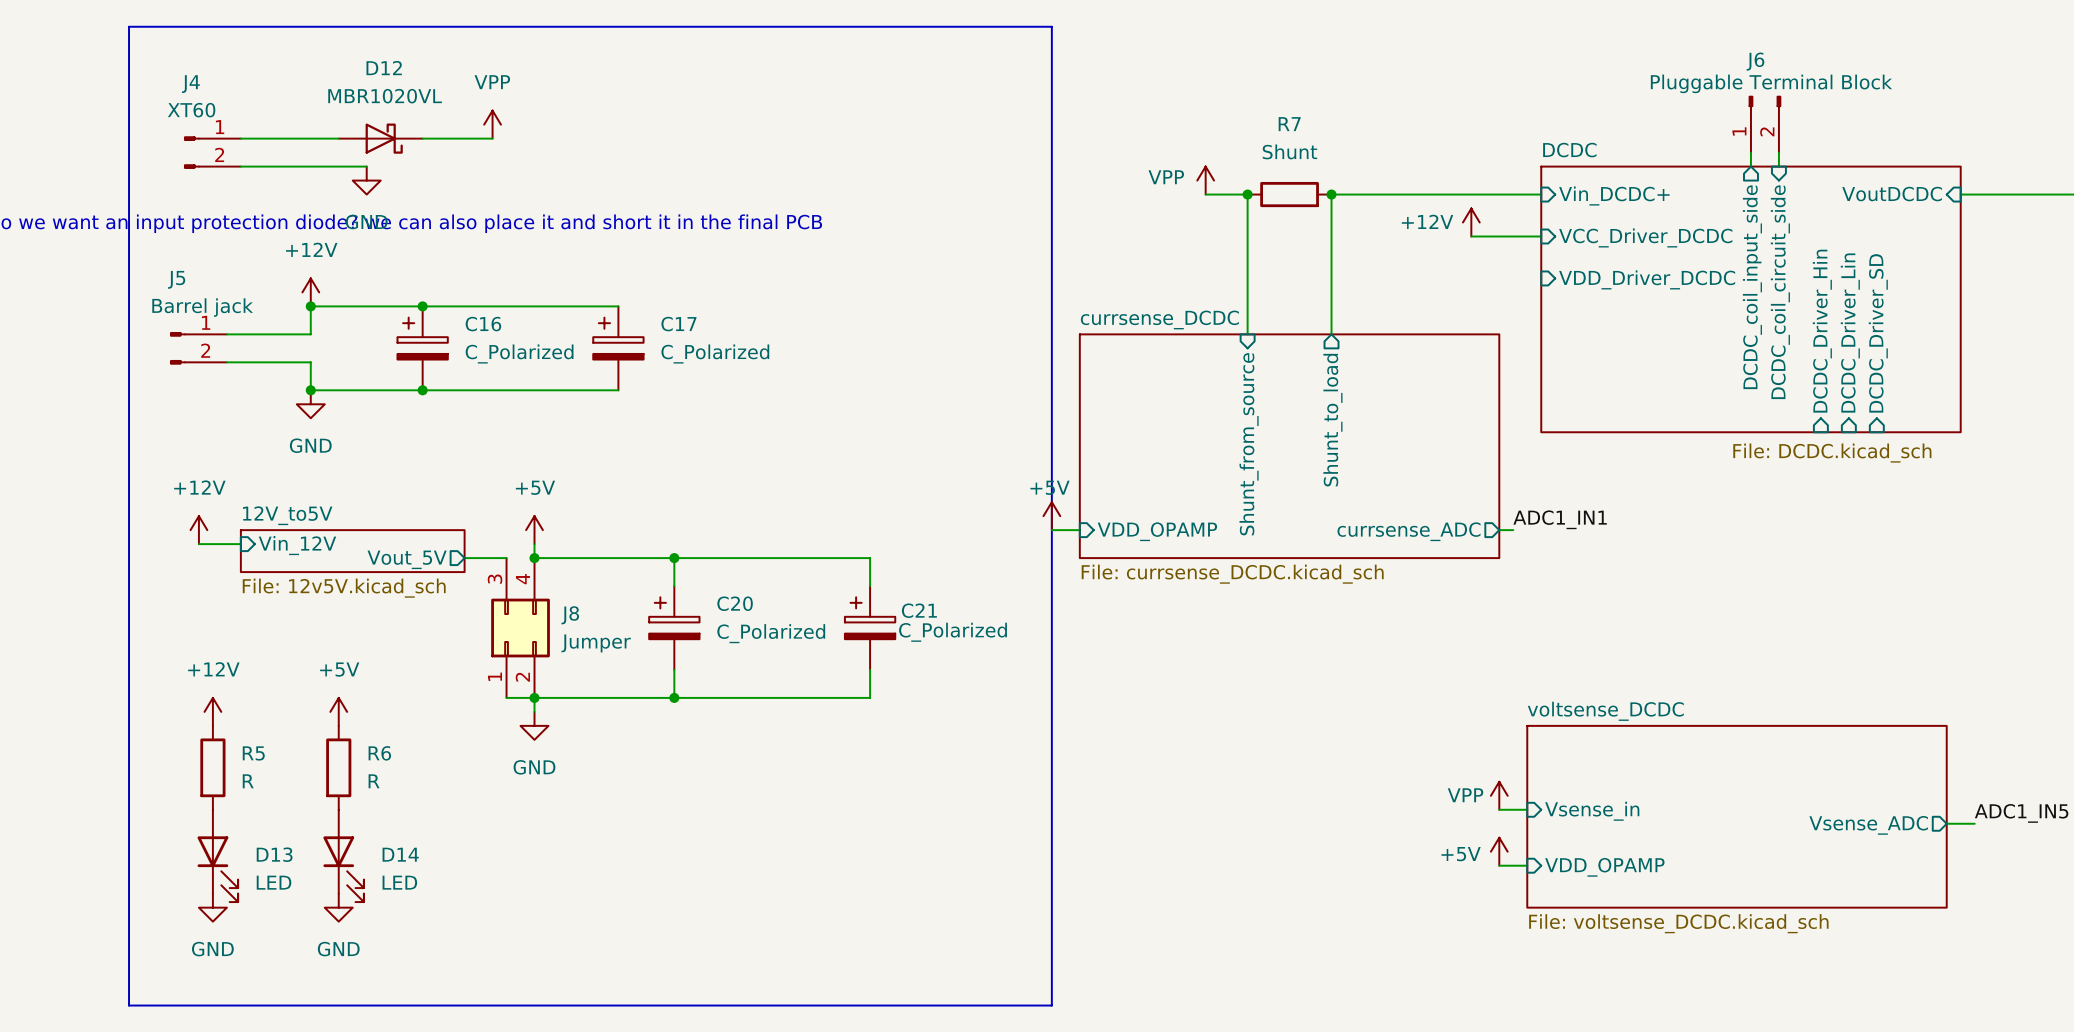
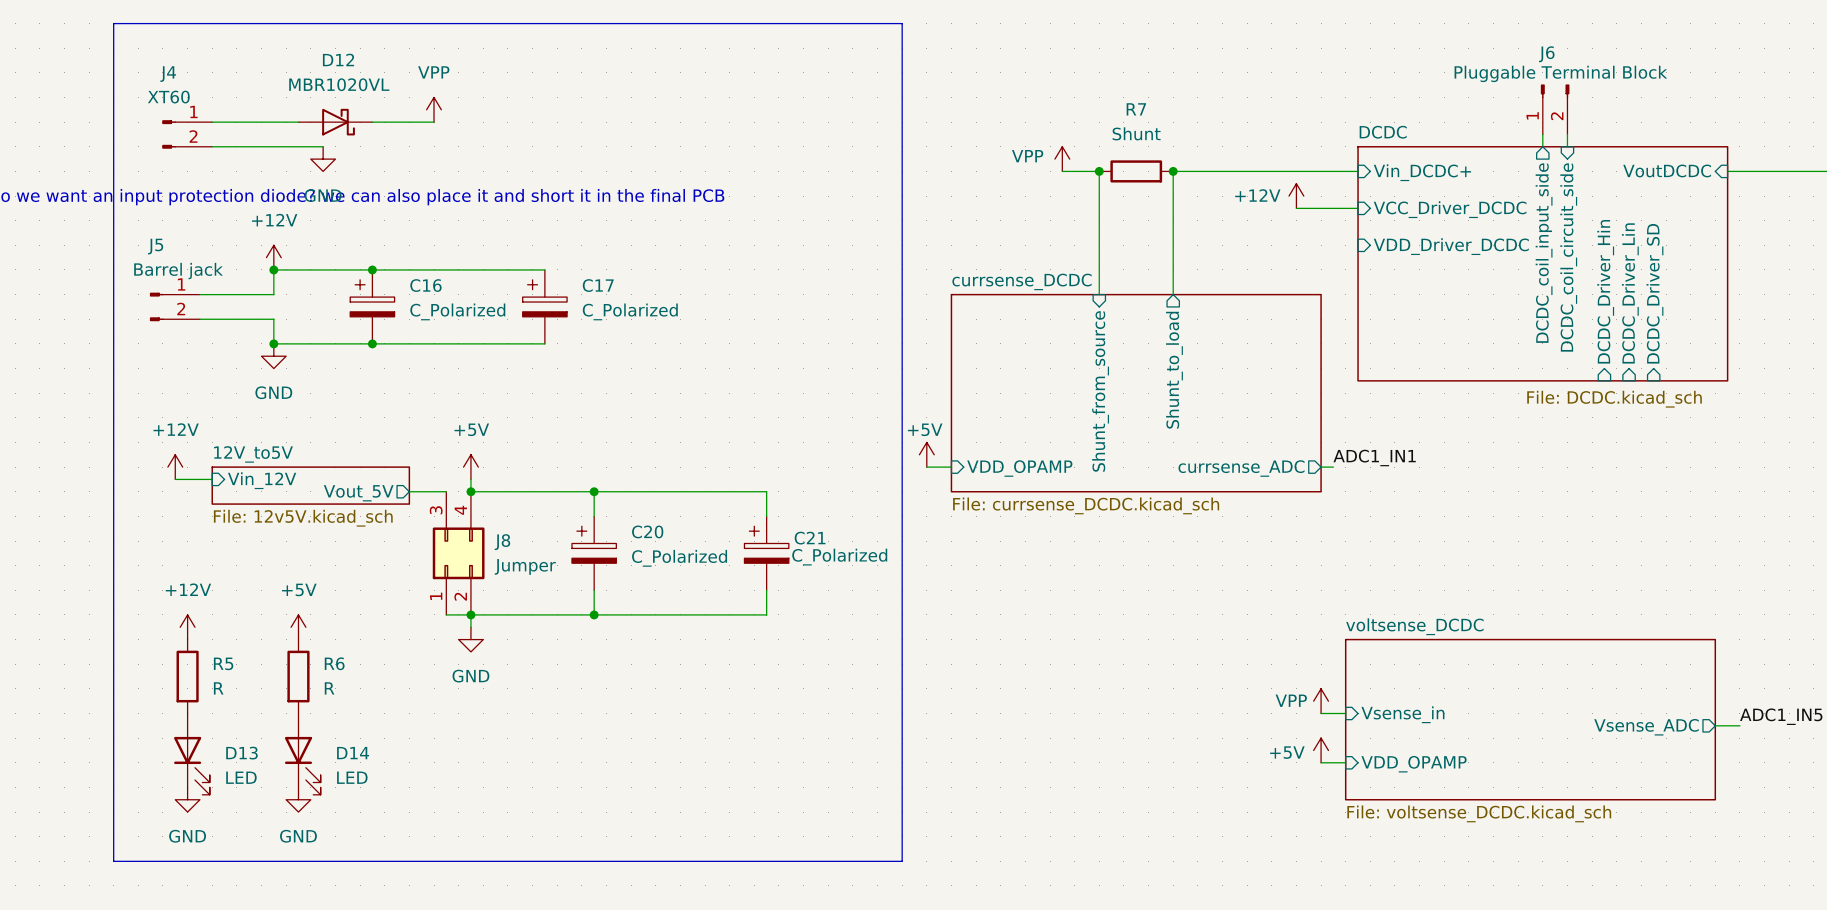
line: (1023, 26) (1051, 26) (1051, 1005) (129, 1005) (129, 977) -> (902, 23) (902, 861) (113, 861)

